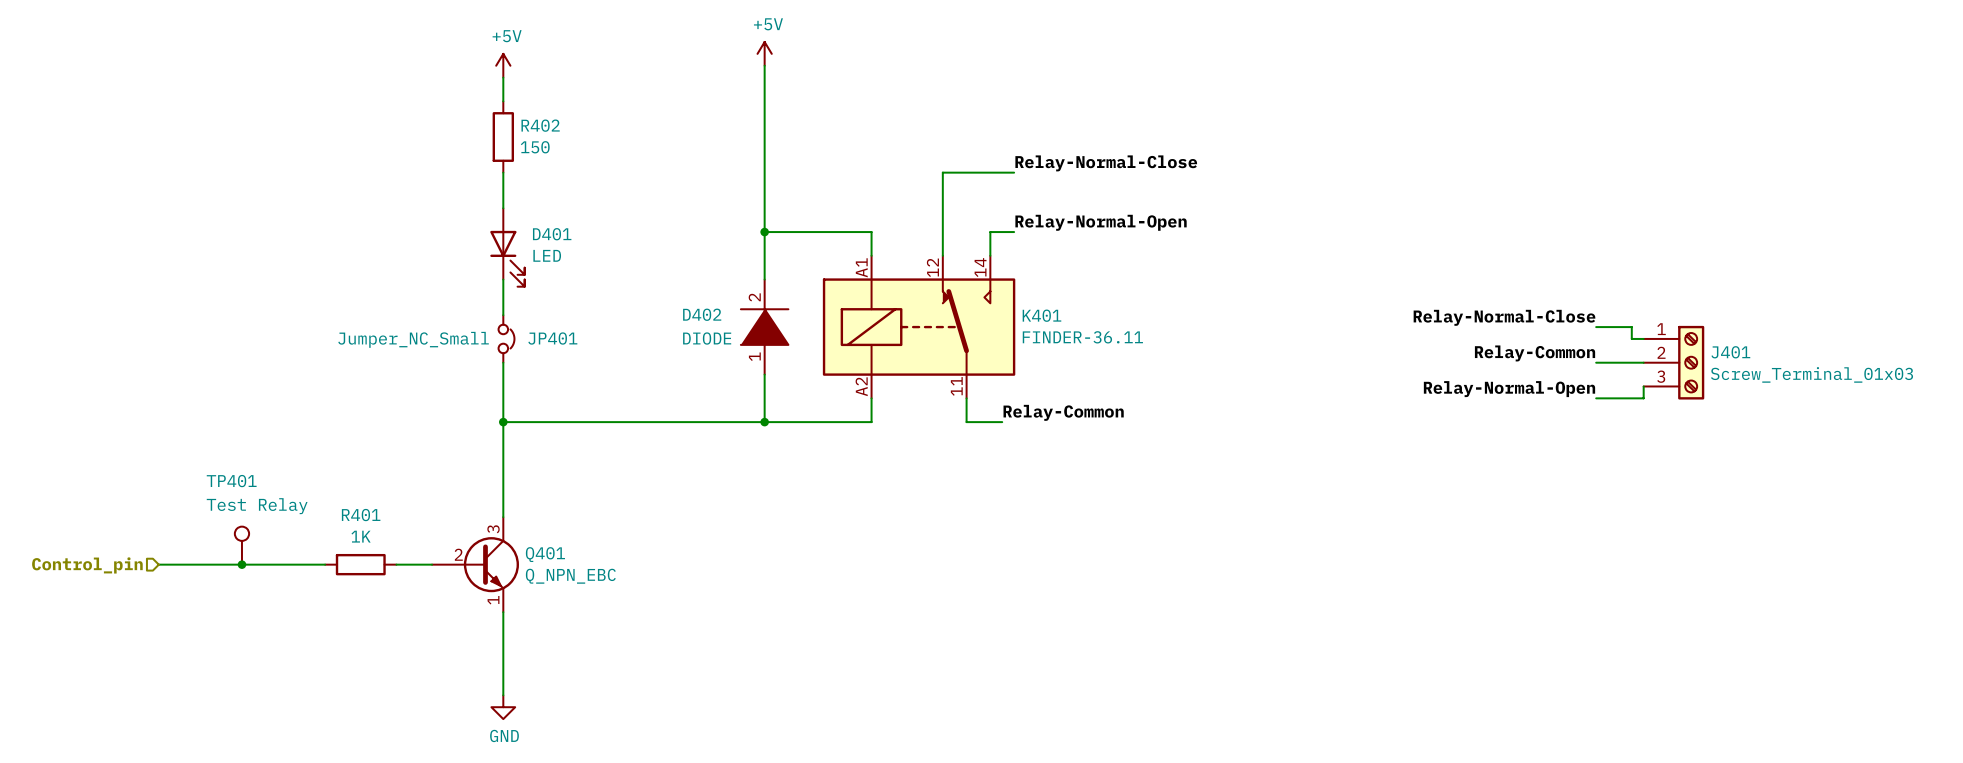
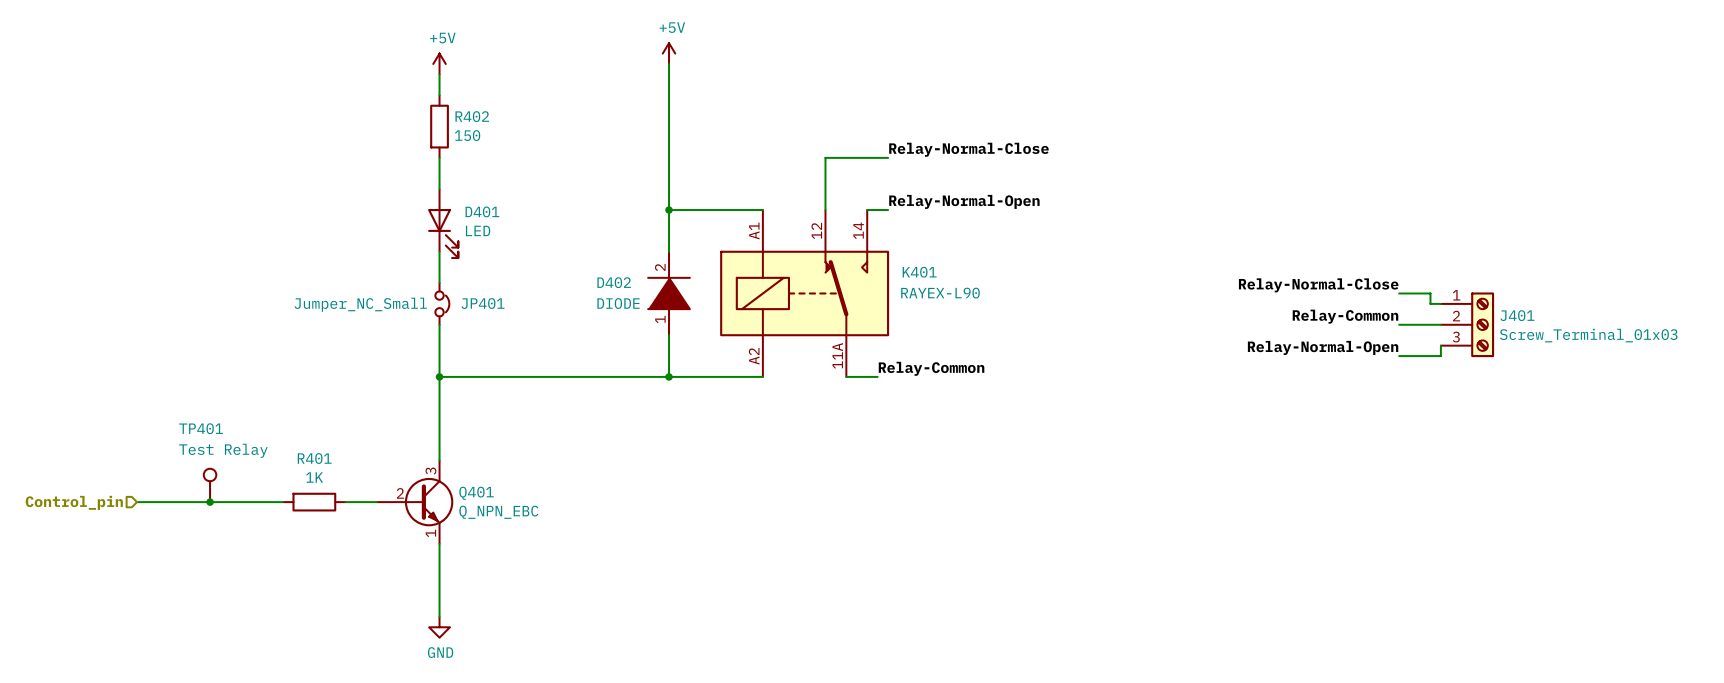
K401 symbol: [822, 255, 1016, 399] -> [720, 210, 890, 377]
K401 value: FINDER-36.11 (1082, 337) -> RAYEX-L90 (940, 293)

